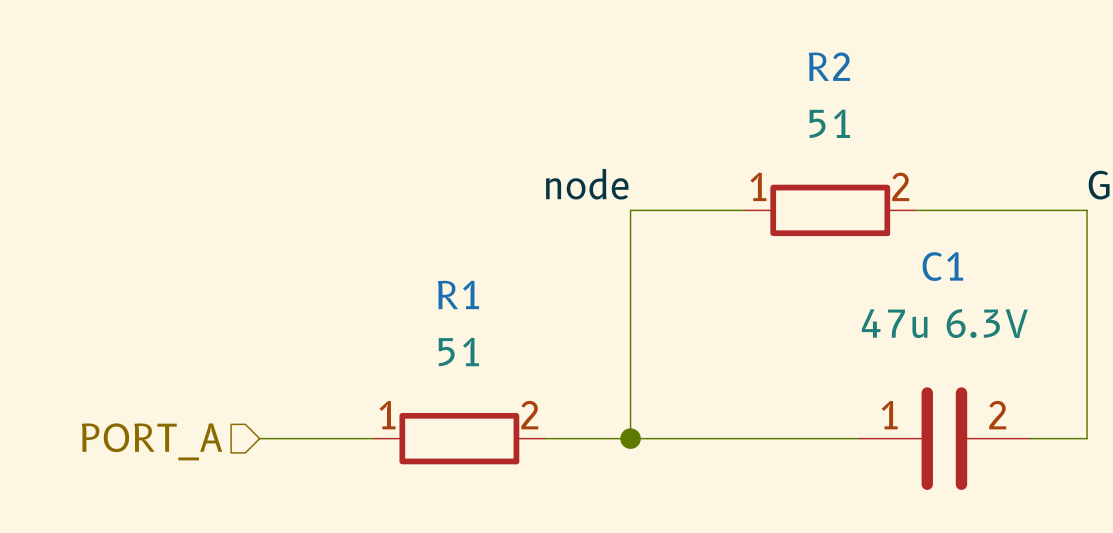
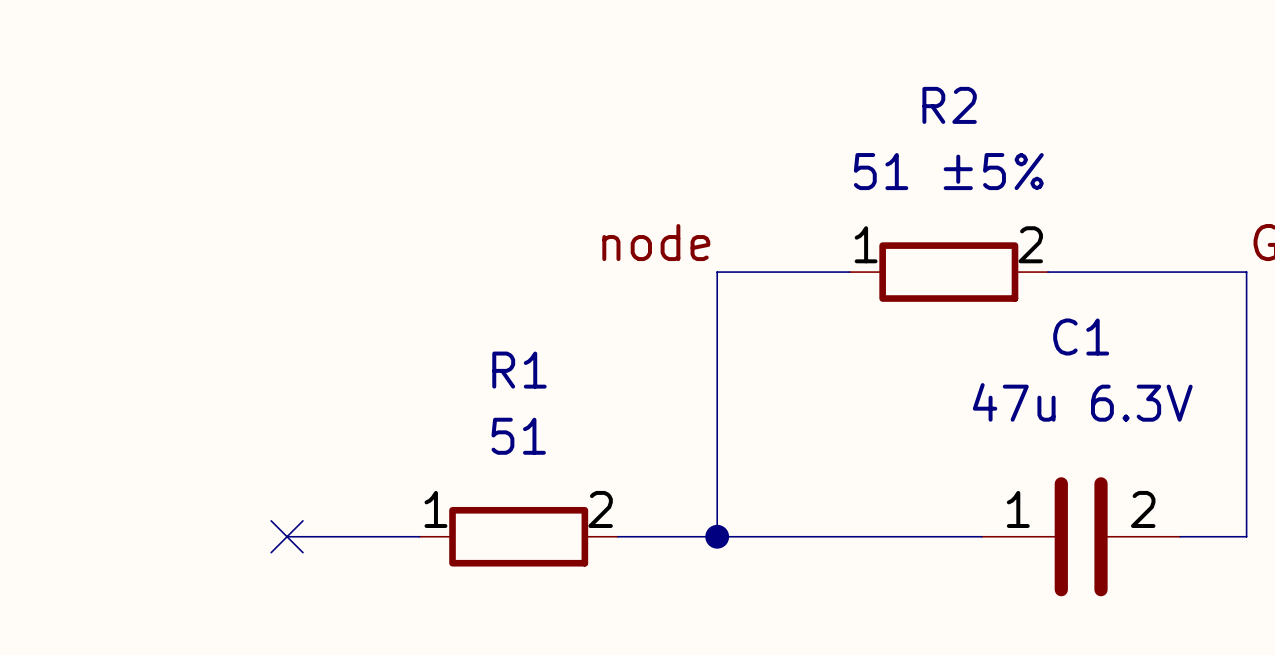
R2 value: 51 (829, 123) -> 51 ±5% (948, 171)
no-connect mark: none -> (287, 536)
hierarchical label: PORT_A (152, 441) -> none

